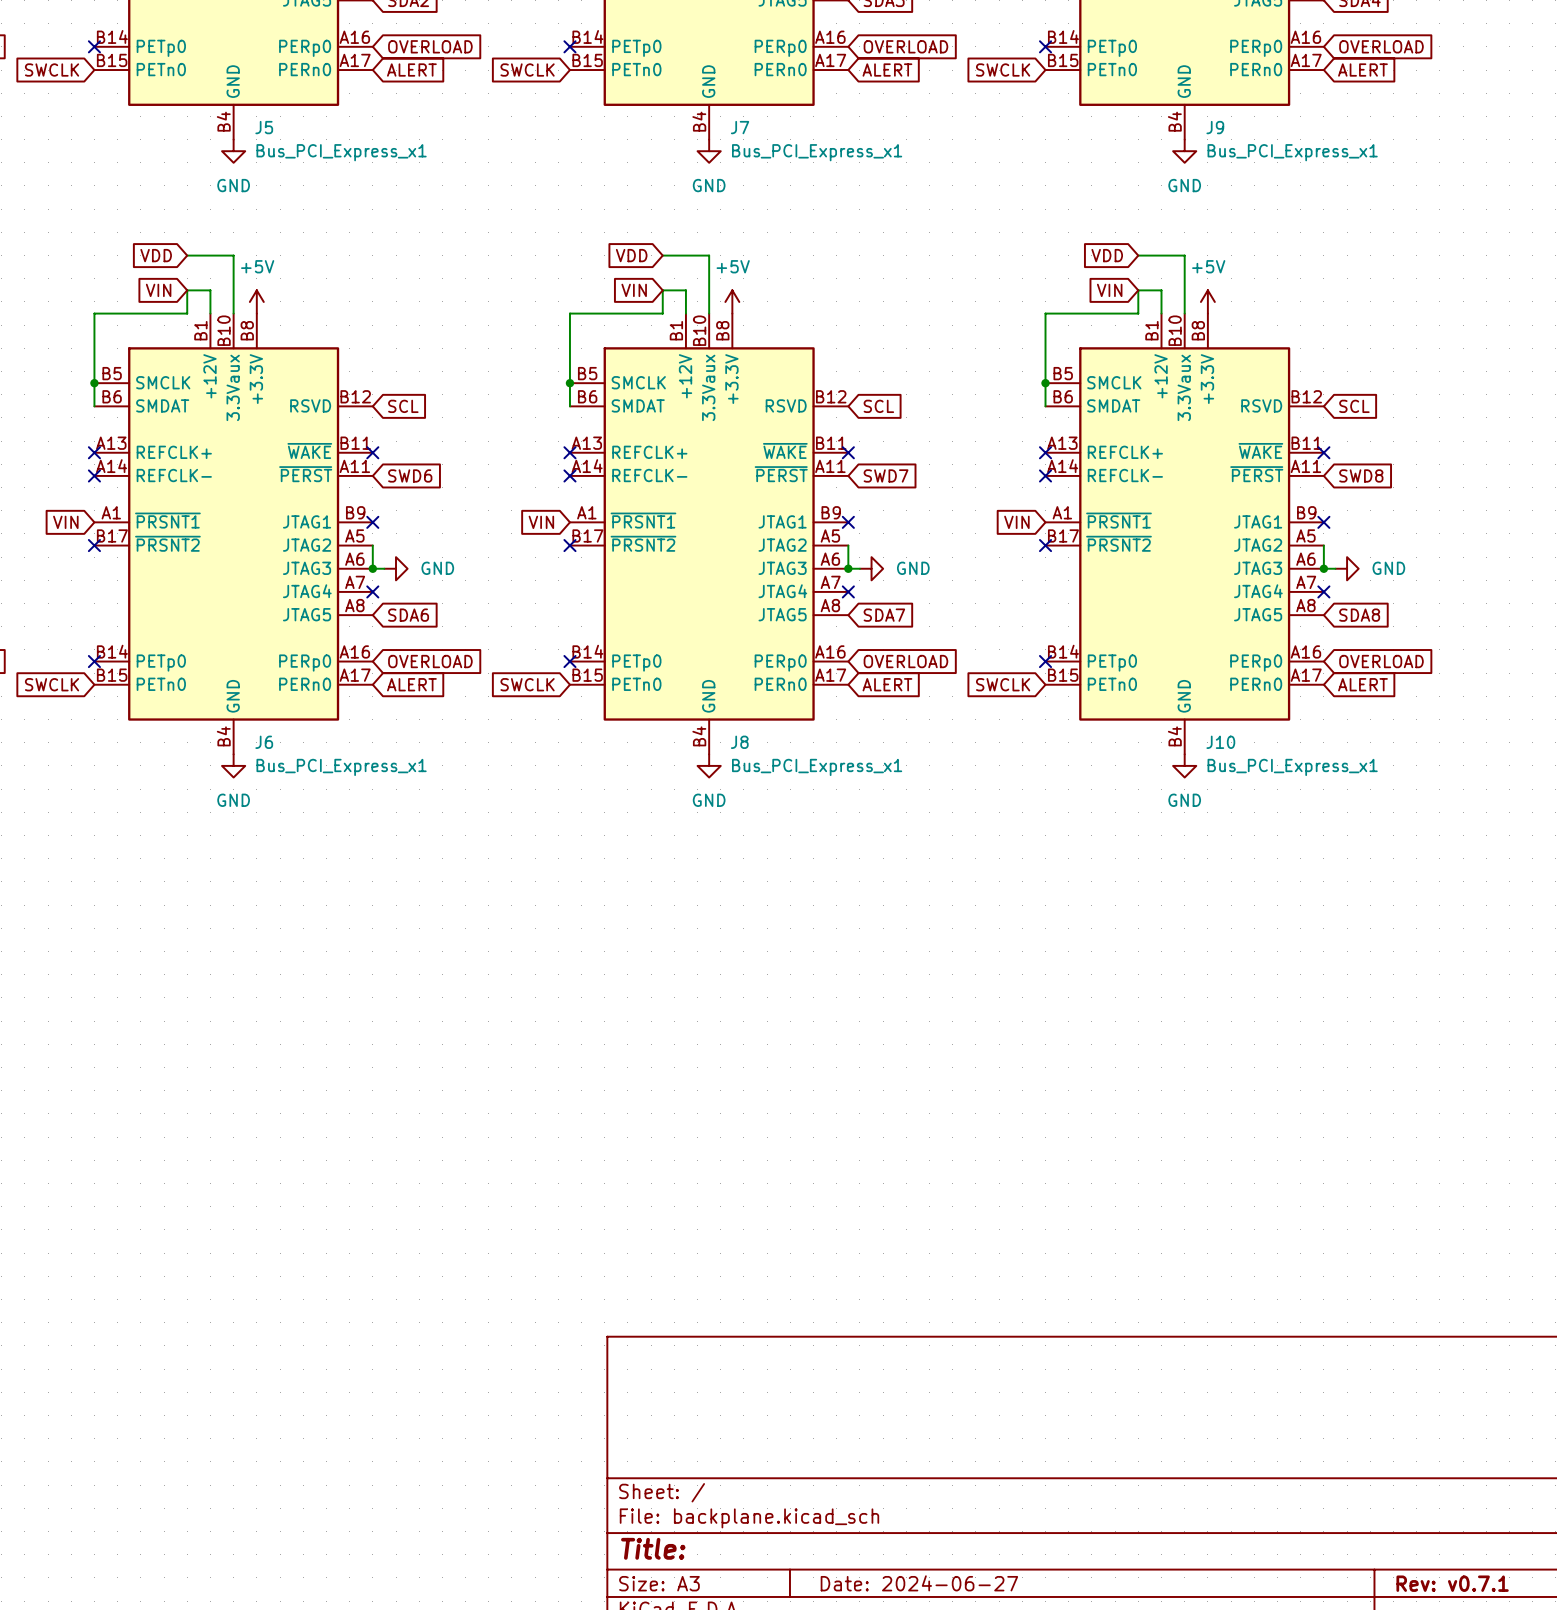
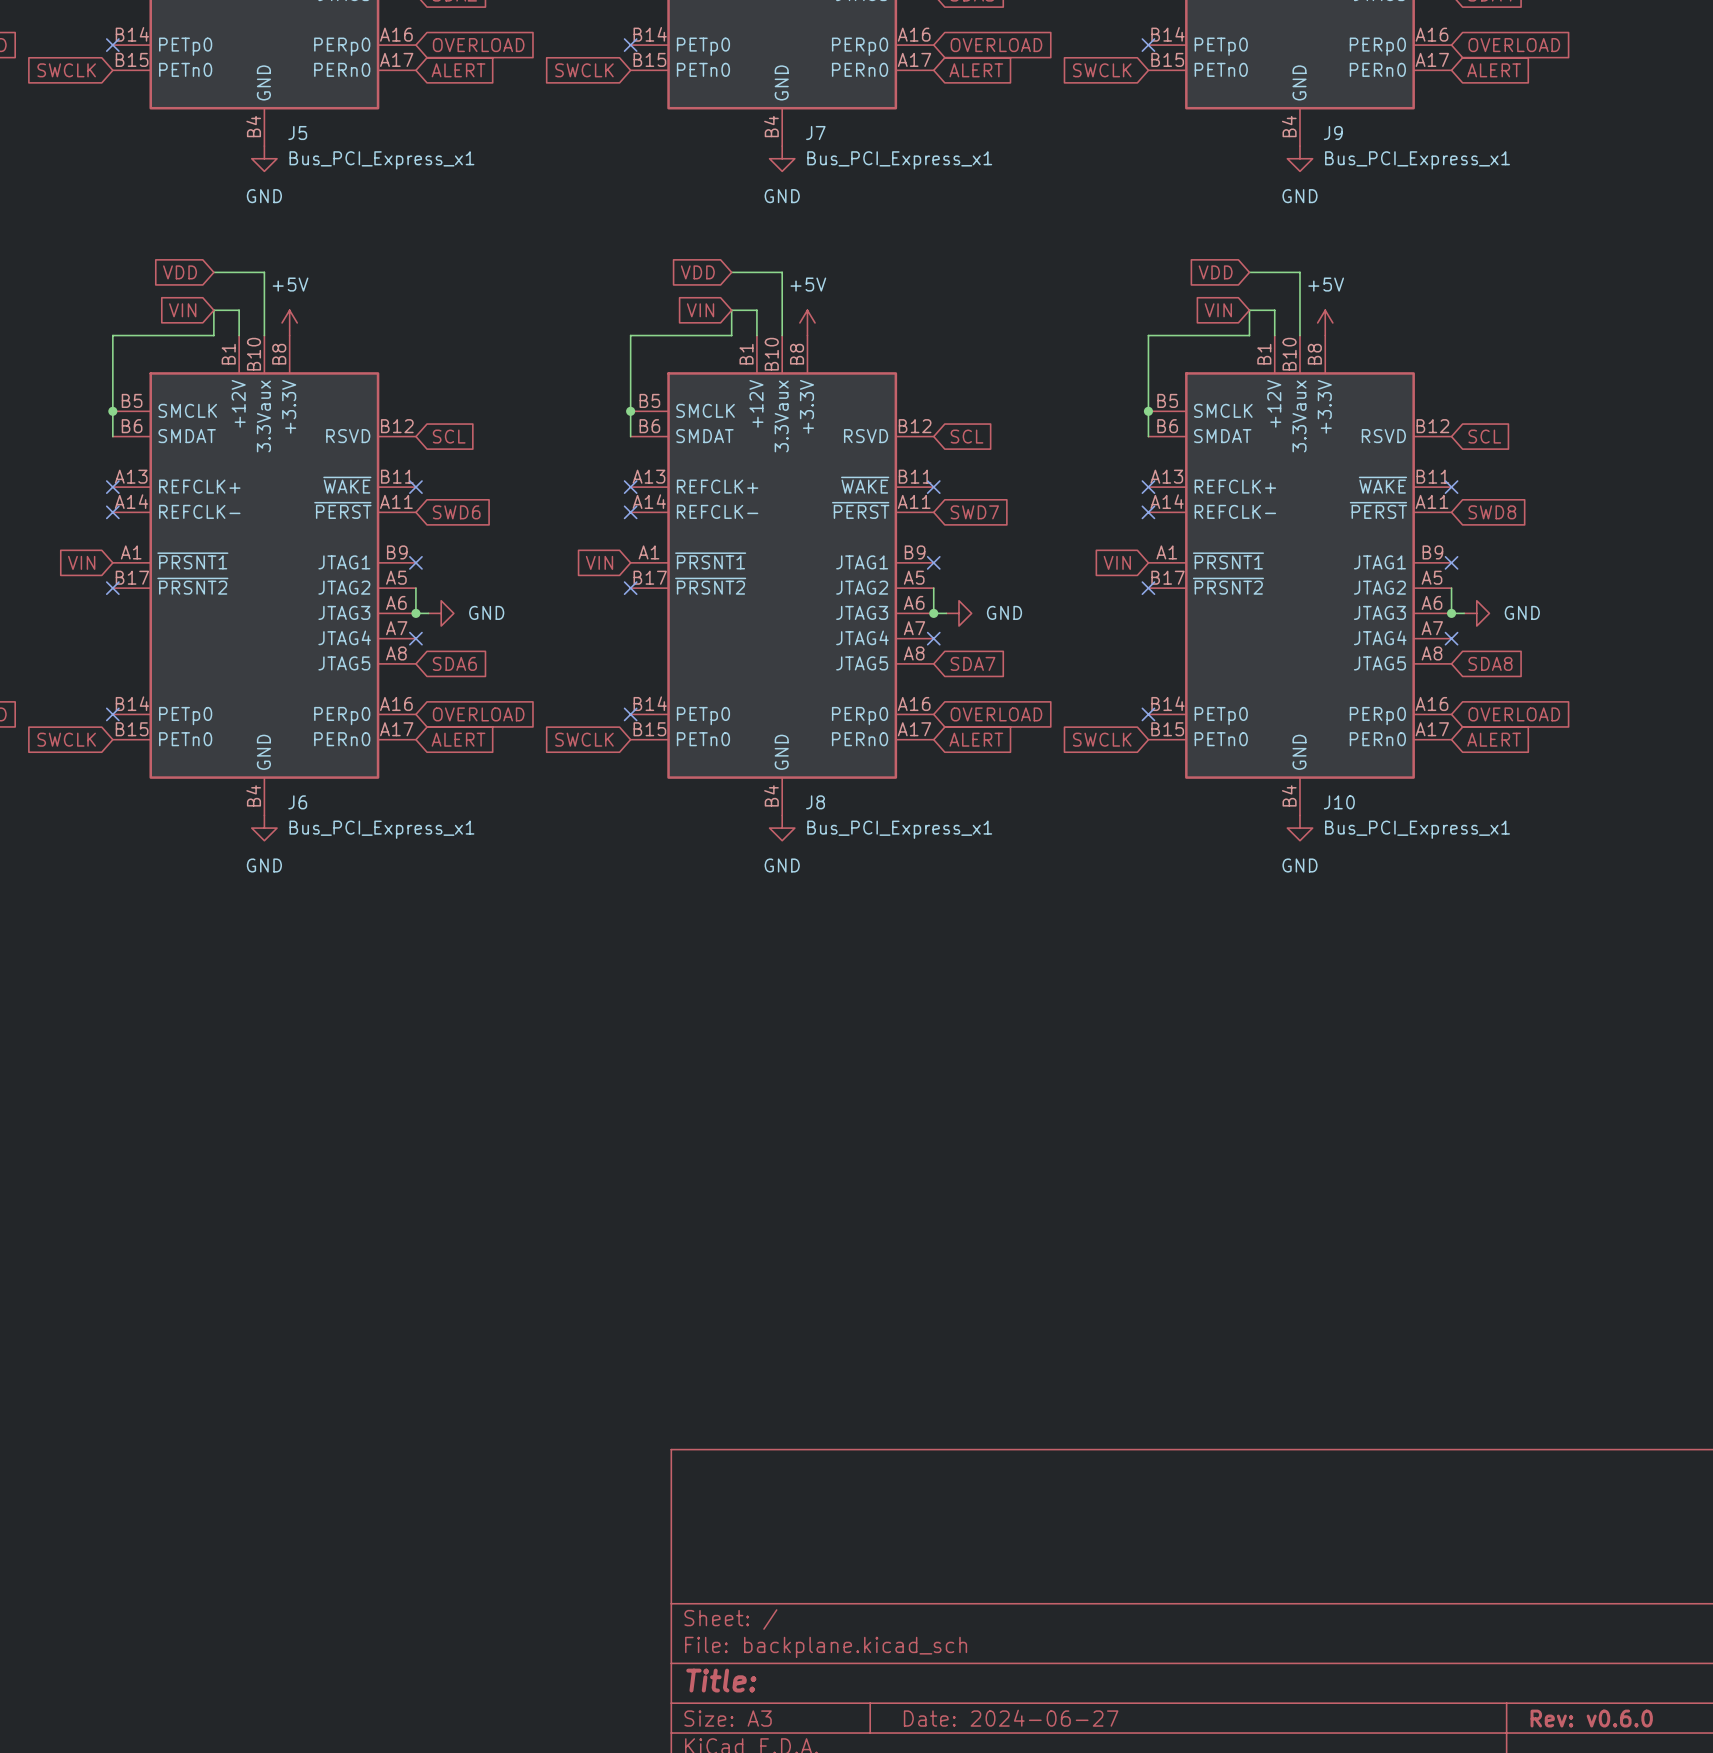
title block: Rev: v0.7.1 (1452, 1583) -> Rev: v0.6.0 (1591, 1718)

